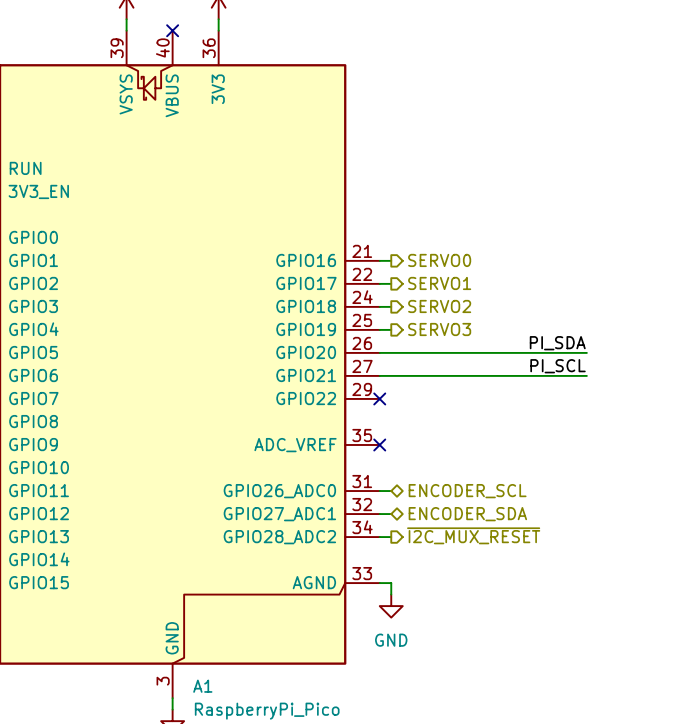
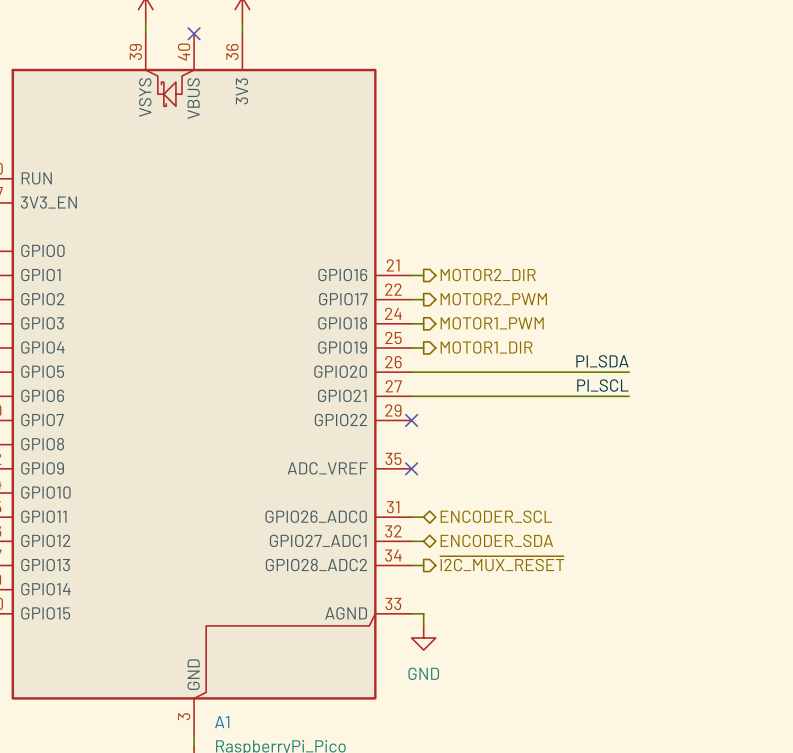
hierarchical label: SERVO0 (439, 260) -> MOTOR2_DIR (488, 275)
hierarchical label: SERVO1 (439, 283) -> MOTOR2_PWM (493, 299)
hierarchical label: SERVO2 (439, 306) -> MOTOR1_PWM (492, 323)
hierarchical label: SERVO3 (439, 329) -> MOTOR1_DIR (486, 347)

